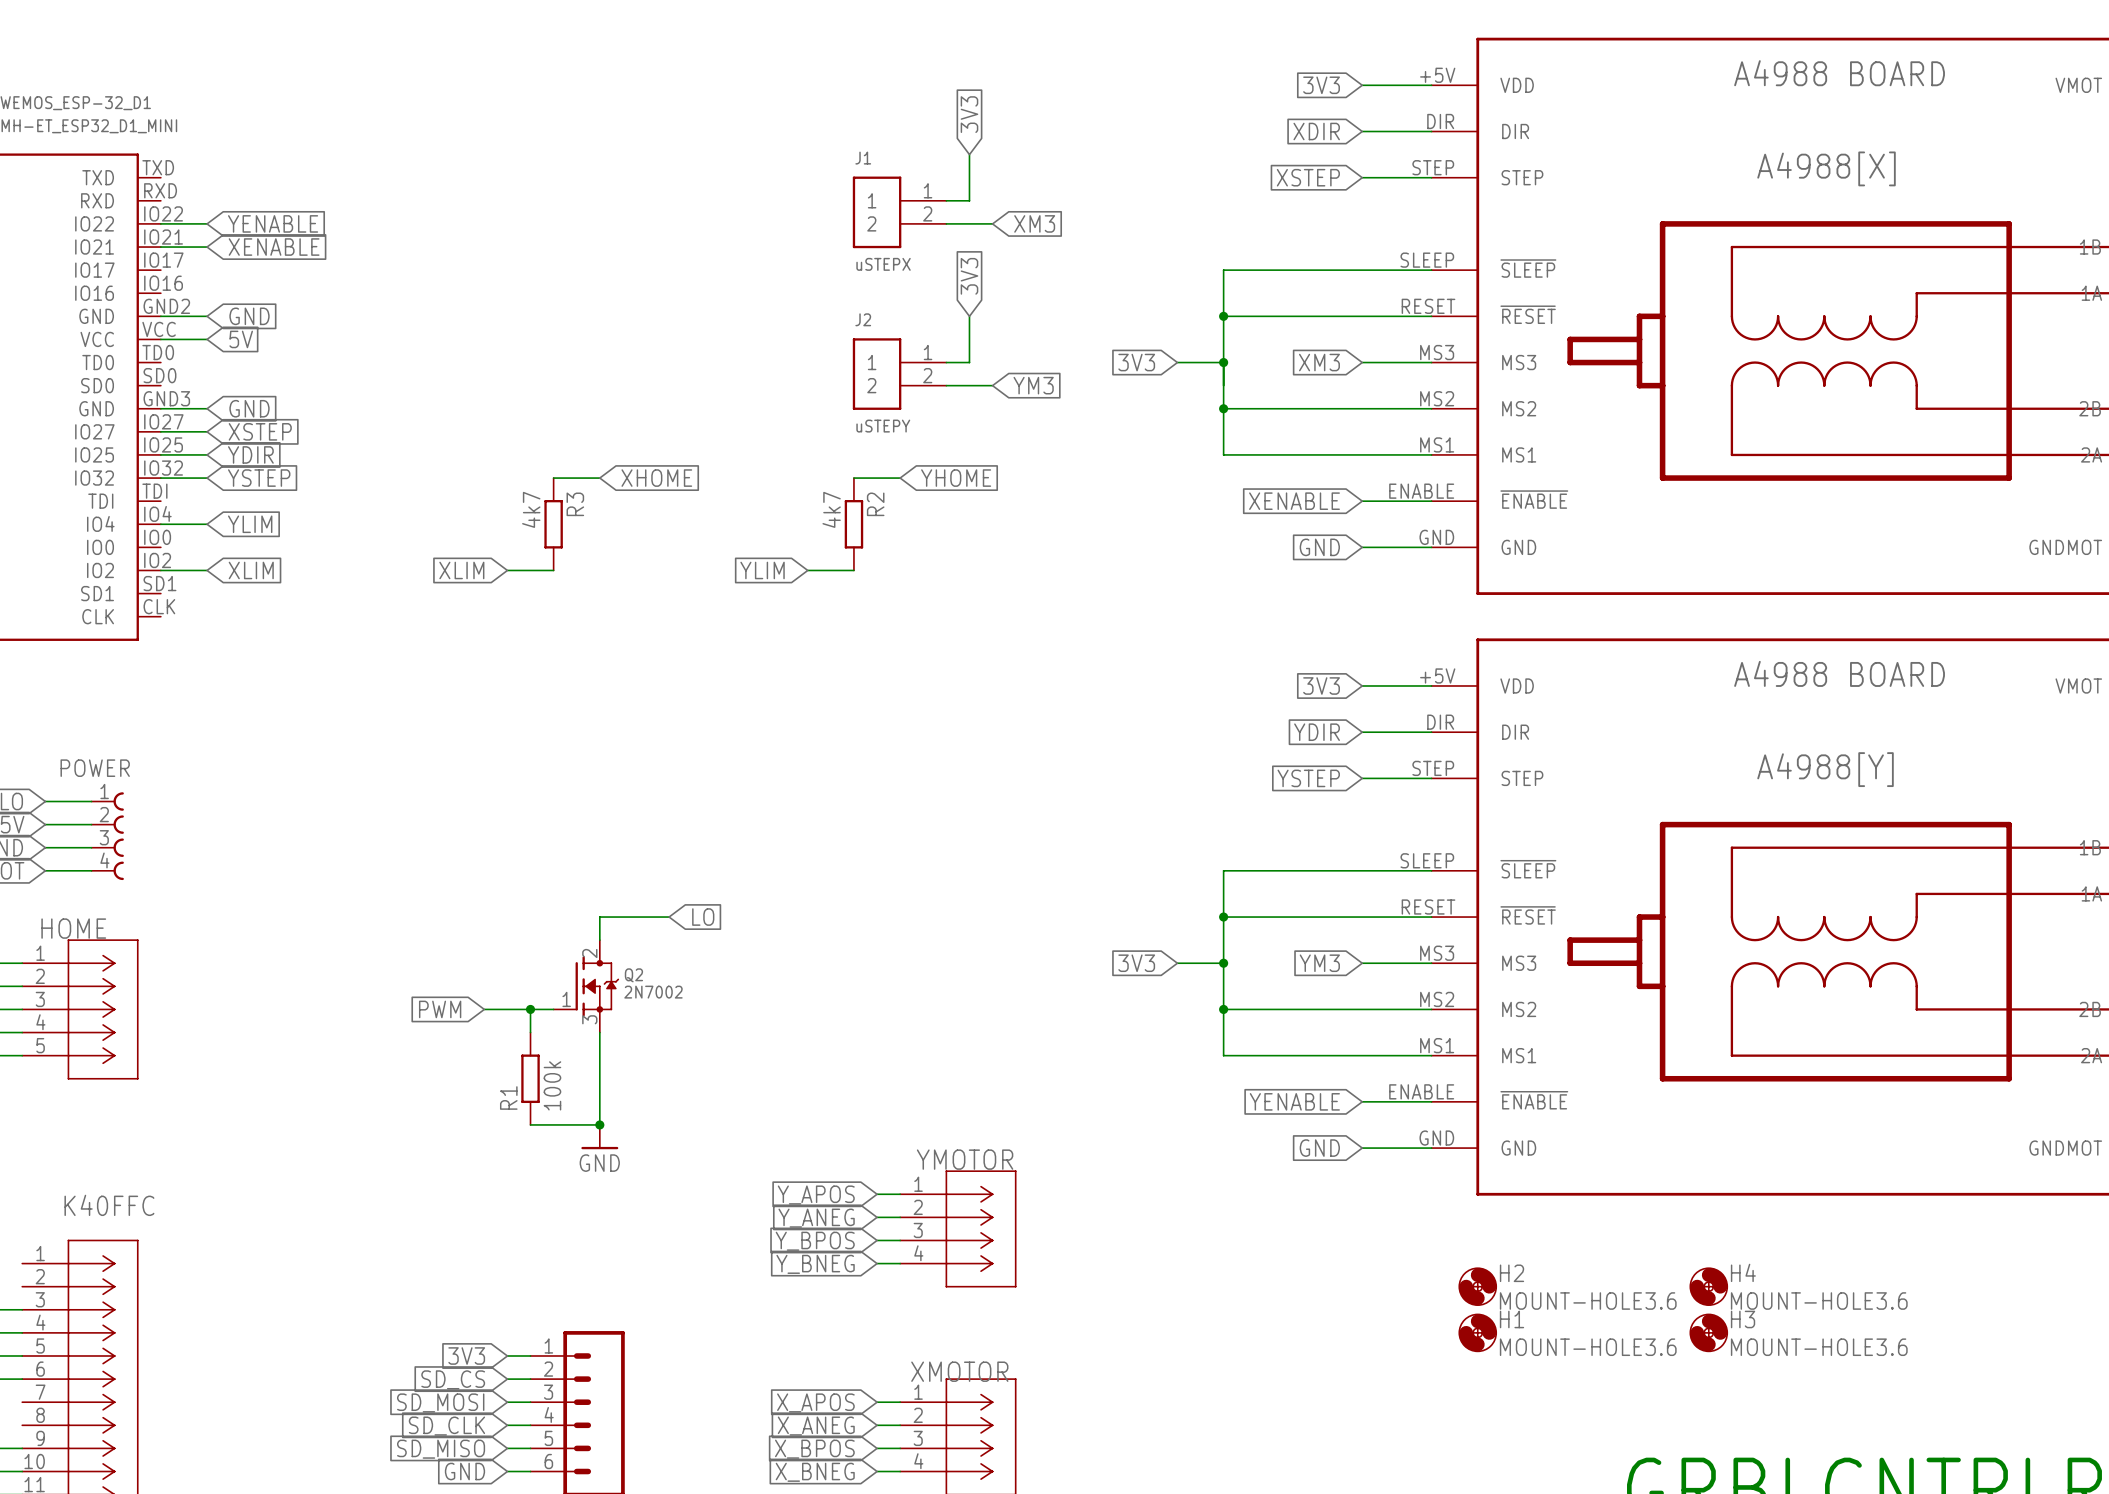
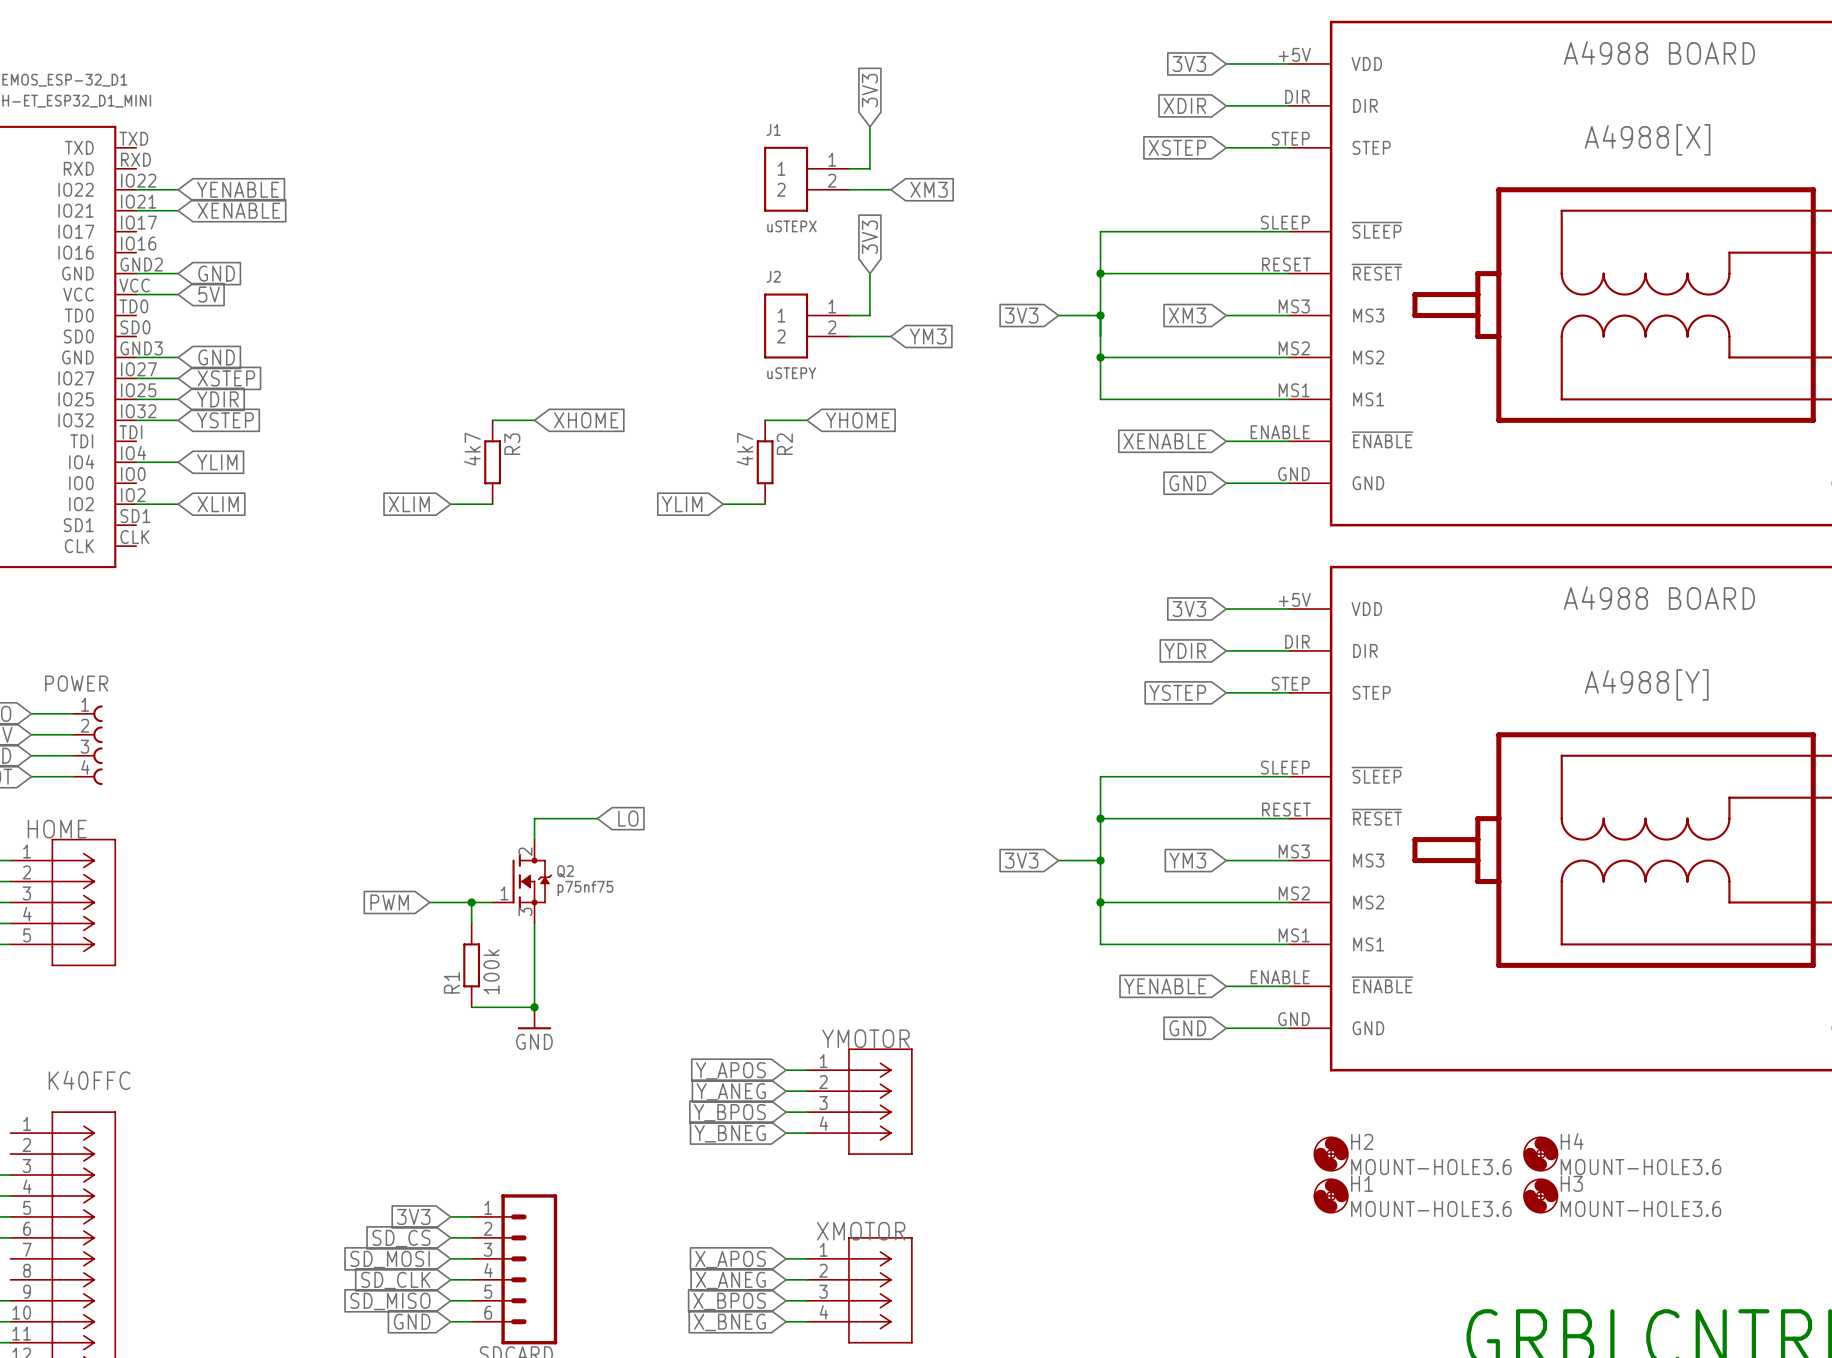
Q2 value: 2N7002 (653, 992) -> p75nf75 (585, 888)

